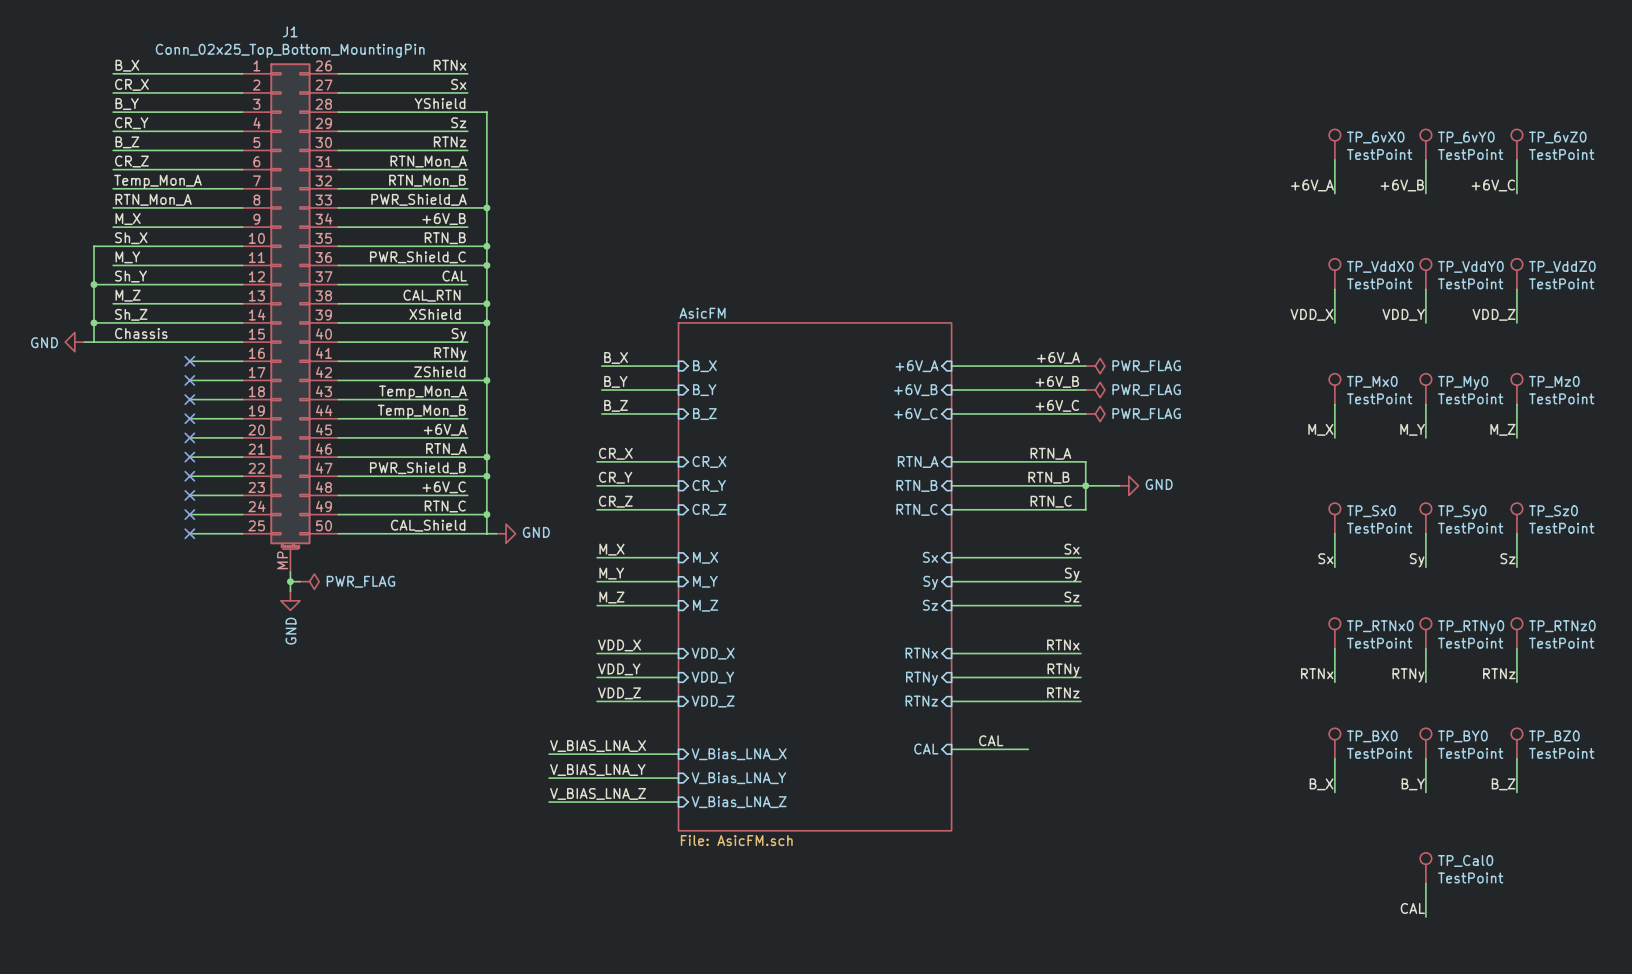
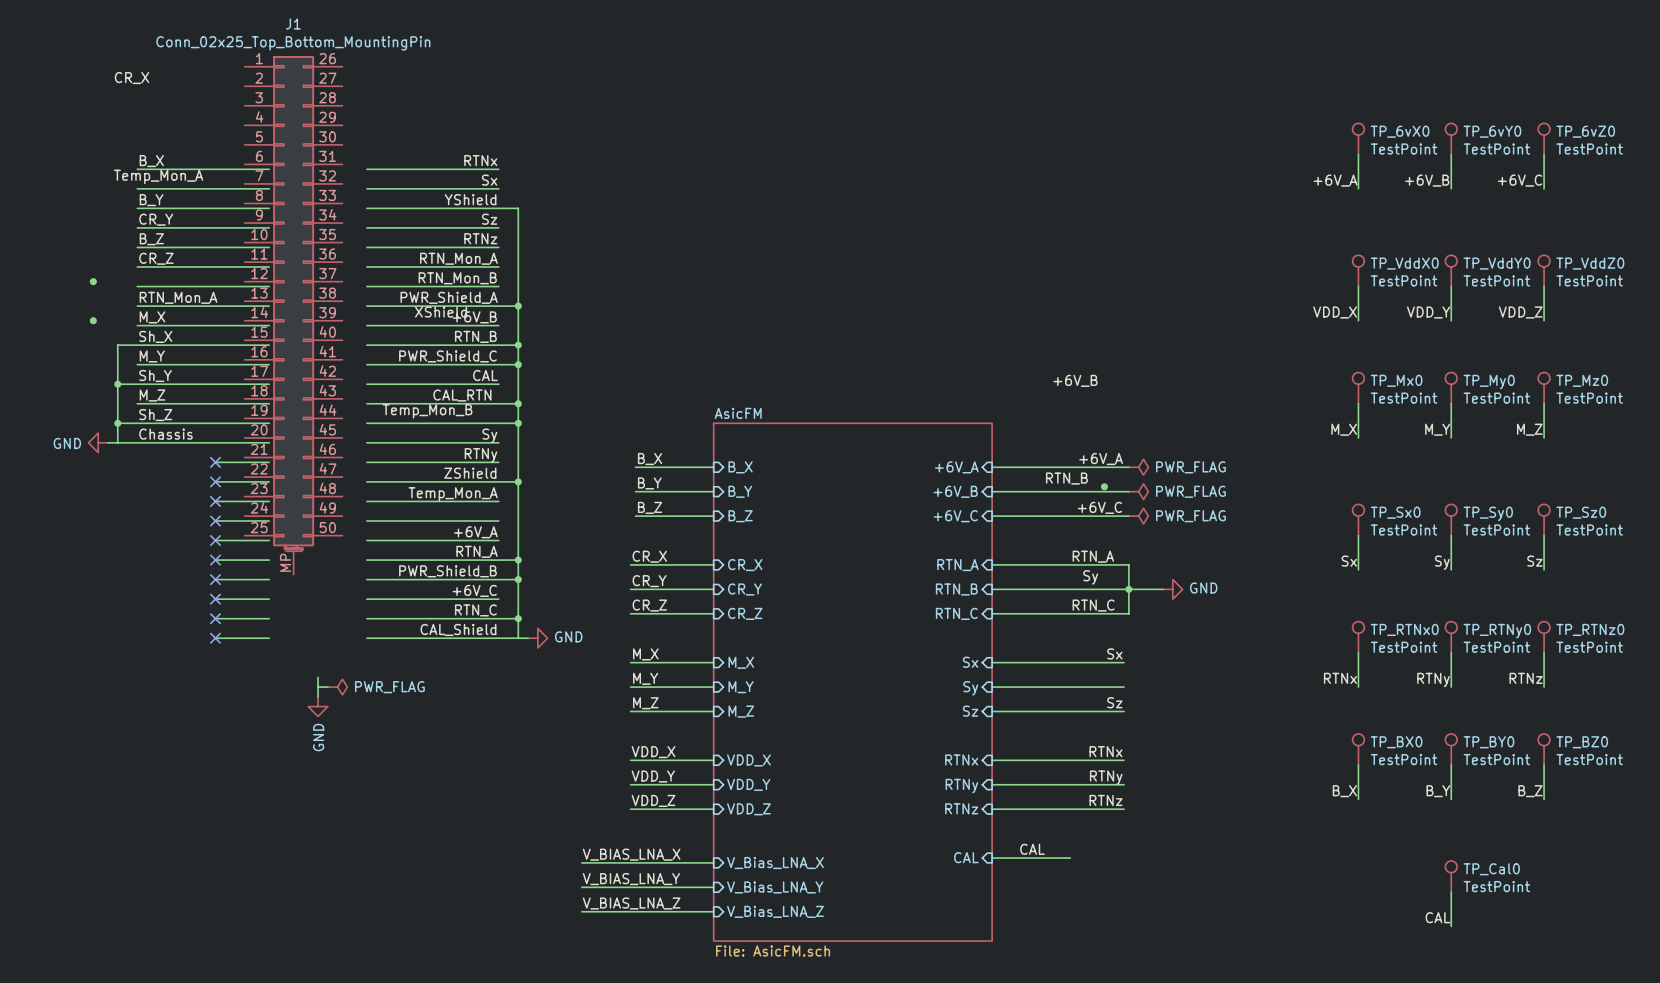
label position: B_X (127, 65) -> B_X (151, 161)
label position: RTNx (450, 65) -> RTNx (480, 160)
wire: (113, 73) (242, 73) -> (137, 169) (269, 169)
wire: (338, 73) (467, 73) -> (366, 169) (498, 169)
label position: Sx (458, 84) -> Sx (489, 180)
wire: (113, 92) (242, 92) -> (137, 188) (269, 188)
wire: (338, 92) (467, 92) -> (366, 188) (498, 188)
label position: YShield (440, 103) -> YShield (470, 199)
label position: B_Y (127, 104) -> B_Y (151, 200)
wire: (113, 112) (242, 112) -> (137, 208) (269, 208)
wire: (338, 112) (486, 112) (486, 533) -> (366, 208) (518, 208) (518, 638)
label position: Sz (458, 122) -> Sz (489, 219)
label position: CR_Y (131, 123) -> CR_Y (156, 219)
wire: (113, 131) (242, 131) -> (137, 227) (269, 227)
wire: (338, 131) (467, 131) -> (366, 227) (498, 227)
label position: RTNz (450, 141) -> RTNz (480, 238)
label position: B_Z (127, 142) -> B_Z (151, 239)
wire: (113, 150) (242, 150) -> (137, 247) (269, 247)
wire: (338, 150) (467, 150) -> (366, 247) (498, 247)
label position: CR_Z (131, 161) -> CR_Z (156, 258)
label position: RTN_Mon_A (428, 161) -> RTN_Mon_A (458, 258)
wire: (113, 169) (242, 169) -> (137, 267) (269, 267)
wire: (338, 169) (467, 169) -> (366, 267) (498, 267)
label position: RTN_Mon_B (427, 180) -> RTN_Mon_B (457, 278)
wire: (113, 188) (242, 188) -> (137, 286) (269, 286)
wire: (338, 188) (467, 188) -> (366, 286) (498, 286)
label position: RTN_Mon_A (153, 199) -> RTN_Mon_A (178, 297)
label position: PWR_Shield_A (419, 199) -> PWR_Shield_A (449, 297)
wire: (113, 207) (242, 207) -> (137, 306) (269, 306)
wire: (338, 207) (486, 207) -> (366, 306) (518, 306)
junction: (486, 207) -> none
label position: M_X (128, 219) -> M_X (152, 317)
label position: +6V_B (444, 219) -> +6V_B (474, 317)
wire: (113, 227) (242, 227) -> (137, 325) (269, 325)
wire: (338, 227) (467, 227) -> (366, 325) (498, 325)
label position: Sh_X (131, 238) -> Sh_X (155, 336)
label position: RTN_B (445, 238) -> RTN_B (475, 336)
wire: (242, 246) (94, 246) (94, 342) -> (269, 345) (117, 345) (117, 442)
wire: (338, 246) (486, 246) -> (366, 345) (518, 345)
junction: (486, 246) -> none
label position: M_Y (127, 257) -> M_Y (152, 356)
label position: PWR_Shield_C (417, 257) -> PWR_Shield_C (447, 356)
wire: (113, 265) (242, 265) -> (137, 364) (269, 364)
wire: (338, 265) (486, 265) -> (366, 364) (518, 364)
junction: (486, 265) -> none
label position: Sh_Y (131, 276) -> Sh_Y (155, 375)
label position: CAL (454, 276) -> CAL (485, 375)
wire: (94, 284) (242, 284) -> (117, 384) (269, 384)
wire: (338, 284) (467, 284) -> (366, 384) (498, 384)
label position: M_Z (128, 295) -> M_Z (152, 395)
label position: CAL_RTN (432, 295) -> CAL_RTN (462, 395)
wire: (113, 303) (242, 303) -> (137, 403) (269, 403)
wire: (338, 303) (486, 303) -> (366, 403) (518, 403)
junction: (486, 303) -> none
junction: none -> (518, 306)
label position: Sh_Z (131, 314) -> Sh_Z (155, 415)
wire: (94, 322) (242, 322) -> (117, 423) (269, 423)
wire: (338, 322) (486, 322) -> (366, 423) (518, 423)
junction: (486, 322) -> none
label position: Chassis (141, 333) -> Chassis (165, 434)
label position: Sy (458, 335) -> Sy (489, 435)
power symbol position: GND (74, 342) -> GND (98, 442)
wire: (84, 342) (242, 342) -> (108, 442) (269, 442)
wire: (338, 342) (467, 342) -> (366, 442) (498, 442)
junction: none -> (518, 345)
label position: RTNy (450, 354) -> RTNy (481, 455)
label position: B_X (616, 357) -> B_X (650, 459)
label position: +6V_A (1058, 357) -> +6V_A (1101, 459)
wire: (189, 361) (242, 361) -> (215, 462) (269, 462)
no-connect mark: (189, 361) -> none
wire: (338, 361) (467, 361) -> (366, 462) (498, 462)
junction: none -> (518, 364)
wire: (601, 366) (678, 366) -> (635, 467) (713, 467)
sheet pin position: B_X (704, 366) -> B_X (740, 467)
sheet pin position: +6V_A (917, 366) -> +6V_A (956, 467)
wire: (951, 366) (1085, 366) -> (992, 467) (1128, 467)
power symbol: PWR_FLAG (1095, 366) -> none
label position: ZShield (439, 371) -> ZShield (470, 473)
wire: (189, 380) (242, 380) -> (215, 481) (269, 481)
no-connect mark: (189, 380) -> none
wire: (338, 380) (486, 380) -> (366, 481) (518, 481)
junction: (486, 380) -> none
label position: B_Y (615, 381) -> B_Y (649, 483)
junction: none -> (117, 384)
wire: (601, 390) (678, 390) -> (635, 491) (713, 491)
sheet pin position: B_Y (704, 390) -> B_Y (740, 491)
sheet pin position: +6V_B (915, 390) -> +6V_B (955, 491)
wire: (951, 390) (1085, 390) -> (992, 491) (1128, 491)
power symbol: PWR_FLAG (1095, 390) -> none
label position: Temp_Mon_A (422, 392) -> Temp_Mon_A (453, 494)
wire: (189, 399) (242, 399) -> (215, 501) (269, 501)
no-connect mark: (189, 399) -> none
wire: (338, 399) (467, 399) -> (366, 501) (498, 501)
junction: none -> (518, 403)
label position: B_Z (616, 405) -> B_Z (650, 507)
label position: +6V_C (1057, 405) -> +6V_C (1099, 507)
wire: (601, 413) (678, 413) -> (635, 516) (713, 516)
wire: (951, 413) (1085, 413) -> (992, 516) (1128, 516)
power symbol: PWR_FLAG (1095, 413) -> none
sheet pin position: B_Z (704, 414) -> B_Z (740, 516)
sheet pin position: +6V_C (915, 414) -> +6V_C (955, 516)
wire: (189, 418) (242, 418) -> (215, 520) (269, 520)
no-connect mark: (189, 418) -> none
wire: (338, 418) (467, 418) -> (366, 520) (498, 520)
junction: none -> (117, 423)
junction: none -> (518, 423)
label position: +6V_A (445, 429) -> +6V_A (475, 532)
wire: (189, 437) (242, 437) -> (215, 540) (269, 540)
no-connect mark: (189, 437) -> none
wire: (338, 437) (467, 437) -> (366, 540) (498, 540)
label position: RTN_A (446, 449) -> RTN_A (477, 551)
label position: CR_X (615, 453) -> CR_X (649, 556)
label position: RTN_A (1050, 453) -> RTN_A (1093, 556)
wire: (189, 457) (242, 457) -> (215, 560) (269, 560)
no-connect mark: (189, 457) -> none
wire: (338, 457) (486, 457) -> (366, 560) (518, 560)
junction: (486, 457) -> none
no-connect mark: none -> (215, 462)
wire: (597, 461) (678, 461) -> (630, 564) (713, 564)
sheet pin position: CR_X (709, 461) -> CR_X (745, 565)
sheet pin position: RTN_A (918, 461) -> RTN_A (957, 565)
wire: (951, 461) (1085, 461) (1085, 509) (951, 509) -> (992, 564) (1128, 564) (1128, 613) (992, 613)
power symbol: none -> PWR_FLAG (1138, 467)
label position: PWR_Shield_B (417, 468) -> PWR_Shield_B (447, 571)
wire: (189, 476) (242, 476) -> (215, 579) (269, 579)
no-connect mark: (189, 476) -> none
wire: (338, 476) (486, 476) -> (366, 579) (518, 579)
junction: (486, 476) -> none
label position: CR_Y (615, 477) -> CR_Y (649, 581)
no-connect mark: none -> (215, 481)
junction: none -> (518, 481)
wire: (597, 485) (678, 485) -> (630, 589) (713, 589)
sheet pin position: CR_Y (709, 485) -> CR_Y (745, 589)
sheet pin position: RTN_B (917, 485) -> RTN_B (956, 589)
wire: (951, 485) (1119, 485) -> (992, 589) (1163, 589)
power symbol position: GND (1128, 485) -> GND (1172, 589)
label position: +6V_C (444, 487) -> +6V_C (474, 590)
power symbol: none -> PWR_FLAG (1138, 491)
wire: (189, 495) (242, 495) -> (215, 599) (269, 599)
no-connect mark: (189, 495) -> none
wire: (338, 495) (467, 495) -> (366, 599) (498, 599)
no-connect mark: none -> (215, 501)
label position: CR_Z (615, 501) -> CR_Z (649, 605)
label position: RTN_C (1051, 501) -> RTN_C (1093, 605)
label position: RTN_C (445, 506) -> RTN_C (475, 610)
wire: (597, 509) (678, 509) -> (630, 613) (713, 613)
sheet pin position: CR_Z (709, 509) -> CR_Z (745, 613)
sheet pin position: RTN_C (917, 509) -> RTN_C (956, 613)
wire: (189, 514) (242, 514) -> (215, 618) (269, 618)
no-connect mark: (189, 514) -> none
wire: (338, 514) (486, 514) -> (366, 618) (518, 618)
junction: (486, 514) -> none
power symbol: none -> PWR_FLAG (1138, 516)
no-connect mark: none -> (215, 520)
label position: CAL_Shield (428, 525) -> CAL_Shield (458, 629)
wire: (189, 533) (242, 533) -> (215, 638) (269, 638)
no-connect mark: (189, 533) -> none
wire: (338, 533) (496, 533) -> (366, 638) (528, 638)
power symbol position: GND (506, 533) -> GND (537, 638)
no-connect mark: none -> (215, 540)
label position: M_X (611, 549) -> M_X (645, 654)
label position: Sx (1071, 549) -> Sx (1114, 653)
no-connect mark: none -> (215, 560)
junction: none -> (518, 560)
wire: (597, 557) (678, 557) -> (630, 662) (713, 662)
sheet pin position: M_X (705, 557) -> M_X (741, 662)
sheet pin position: Sx (930, 557) -> Sx (970, 662)
wire: (951, 557) (1080, 557) -> (992, 662) (1123, 662)
wire: (290, 572) (290, 591) -> (318, 677) (318, 696)
label position: M_Y (611, 573) -> M_Y (645, 678)
no-connect mark: none -> (215, 579)
junction: none -> (518, 579)
sheet AsicFM position: (815, 576) -> (852, 682)
wire: (290, 581) (300, 581) -> (318, 687) (327, 687)
junction: (290, 581) -> none
power symbol position: PWR_FLAG (309, 581) -> PWR_FLAG (337, 687)
wire: (597, 581) (678, 581) -> (630, 687) (713, 687)
sheet pin position: M_Y (705, 581) -> M_Y (741, 687)
wire: (951, 581) (1080, 581) -> (992, 687) (1123, 687)
sheet pin position: Sy (930, 582) -> Sy (970, 688)
junction: none -> (1128, 589)
no-connect mark: none -> (215, 599)
label position: M_Z (611, 597) -> M_Z (645, 703)
label position: Sz (1071, 597) -> Sz (1114, 702)
power symbol position: GND (290, 600) -> GND (318, 706)
wire: (597, 605) (678, 605) -> (630, 711) (713, 711)
sheet pin position: M_Z (705, 605) -> M_Z (741, 711)
sheet pin position: Sz (930, 605) -> Sz (970, 711)
wire: (951, 605) (1080, 605) -> (992, 711) (1123, 711)
no-connect mark: none -> (215, 618)
junction: none -> (518, 618)
no-connect mark: none -> (215, 638)
label position: RTNx (1063, 644) -> RTNx (1106, 751)
label position: VDD_X (619, 645) -> VDD_X (653, 752)
wire: (597, 653) (678, 653) -> none
sheet pin position: VDD_X (713, 653) -> VDD_X (748, 760)
sheet pin position: RTNx (921, 653) -> RTNx (961, 759)
wire: (951, 653) (1080, 653) -> (992, 760) (1123, 760)
label position: VDD_Y (619, 669) -> VDD_Y (653, 776)
label position: RTNy (1063, 670) -> RTNy (1106, 777)
wire: (597, 677) (678, 677) -> none
sheet pin position: VDD_Y (712, 677) -> VDD_Y (748, 784)
wire: (951, 677) (1080, 677) -> (992, 784) (1123, 784)
sheet pin position: RTNy (922, 678) -> RTNy (961, 786)
label position: RTNz (1063, 692) -> RTNz (1106, 800)
label position: VDD_Z (619, 693) -> VDD_Z (653, 800)
wire: (597, 701) (678, 701) -> none
sheet pin position: VDD_Z (713, 701) -> VDD_Z (748, 809)
sheet pin position: RTNz (921, 701) -> RTNz (961, 808)
wire: (951, 701) (1080, 701) -> (992, 809) (1123, 809)
label position: CAL (991, 740) -> CAL (1032, 849)
label position: V_BIAS_LNA_X (598, 746) -> V_BIAS_LNA_X (631, 854)
sheet pin position: CAL (926, 748) -> CAL (966, 857)
wire: (951, 749) (1028, 749) -> (992, 858) (1070, 858)
wire: (549, 754) (621, 754) -> none
wire: none -> (689, 760) (713, 760)
sheet pin position: V_Bias_LNA_X (739, 754) -> V_Bias_LNA_X (775, 863)
label position: V_BIAS_LNA_Y (597, 769) -> V_BIAS_LNA_Y (631, 879)
wire: (549, 778) (621, 778) -> none
wire: none -> (689, 784) (713, 784)
sheet pin position: V_Bias_LNA_Y (738, 778) -> V_Bias_LNA_Y (775, 887)
label position: V_BIAS_LNA_Z (598, 793) -> V_BIAS_LNA_Z (631, 903)
wire: (549, 802) (621, 802) -> none
wire: none -> (689, 809) (713, 809)
sheet pin position: V_Bias_LNA_Z (739, 802) -> V_Bias_LNA_Z (775, 911)
wire: none -> (581, 862) (713, 862)
wire: none -> (581, 887) (713, 887)
wire: none -> (581, 911) (713, 911)

